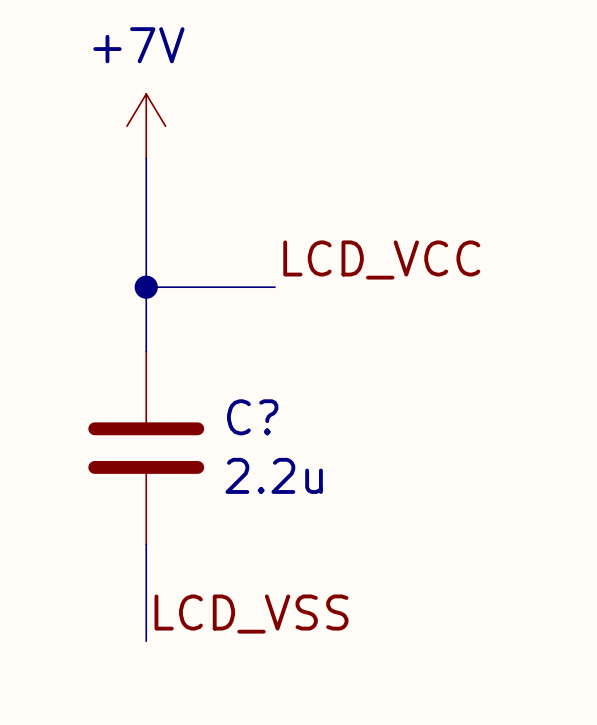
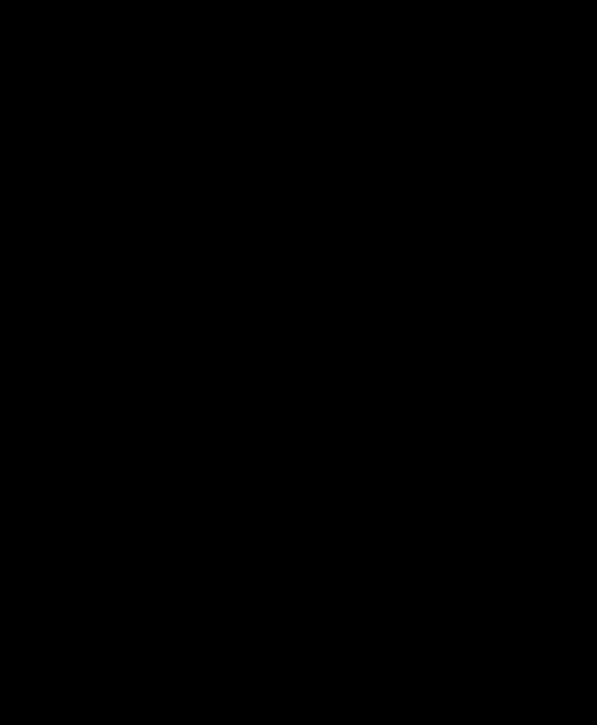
power symbol: +7V (146, 126) -> none
wire: (146, 158) (146, 351) -> none
label: LCD_VCC (381, 259) -> none
wire: (146, 287) (275, 287) -> none
junction: (146, 287) -> none
C?: 2.2u (146, 448) -> none
wire: (146, 544) (146, 641) -> none
label: LCD_VSS (251, 614) -> none

